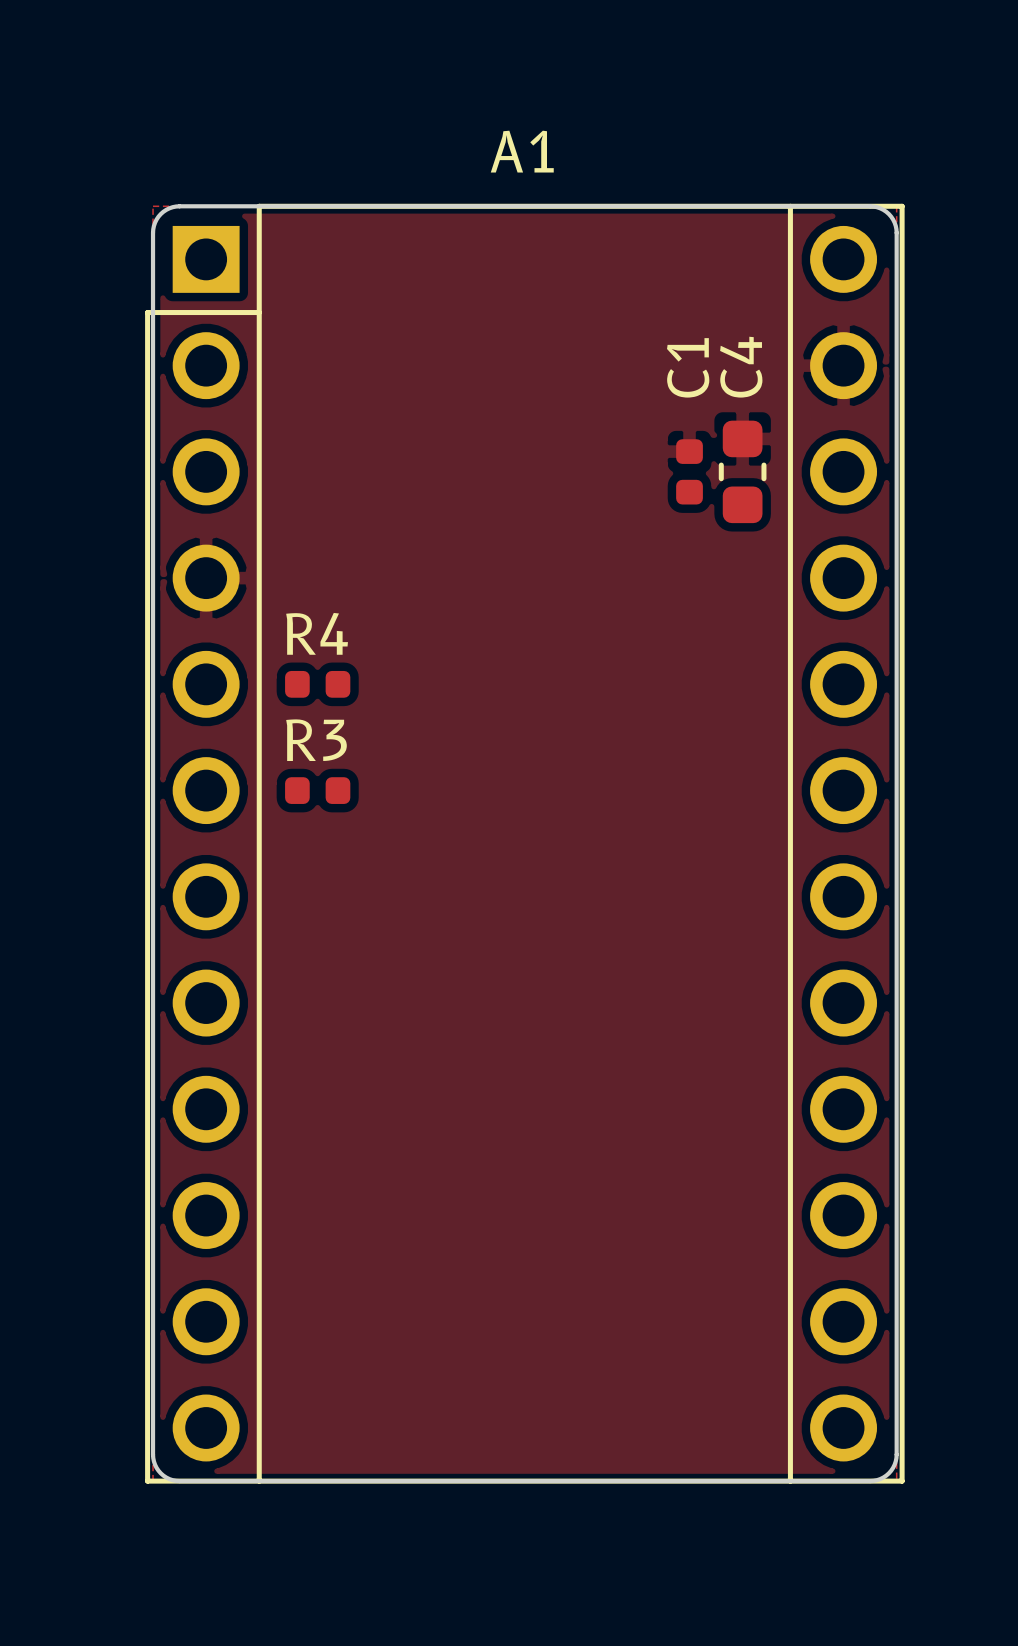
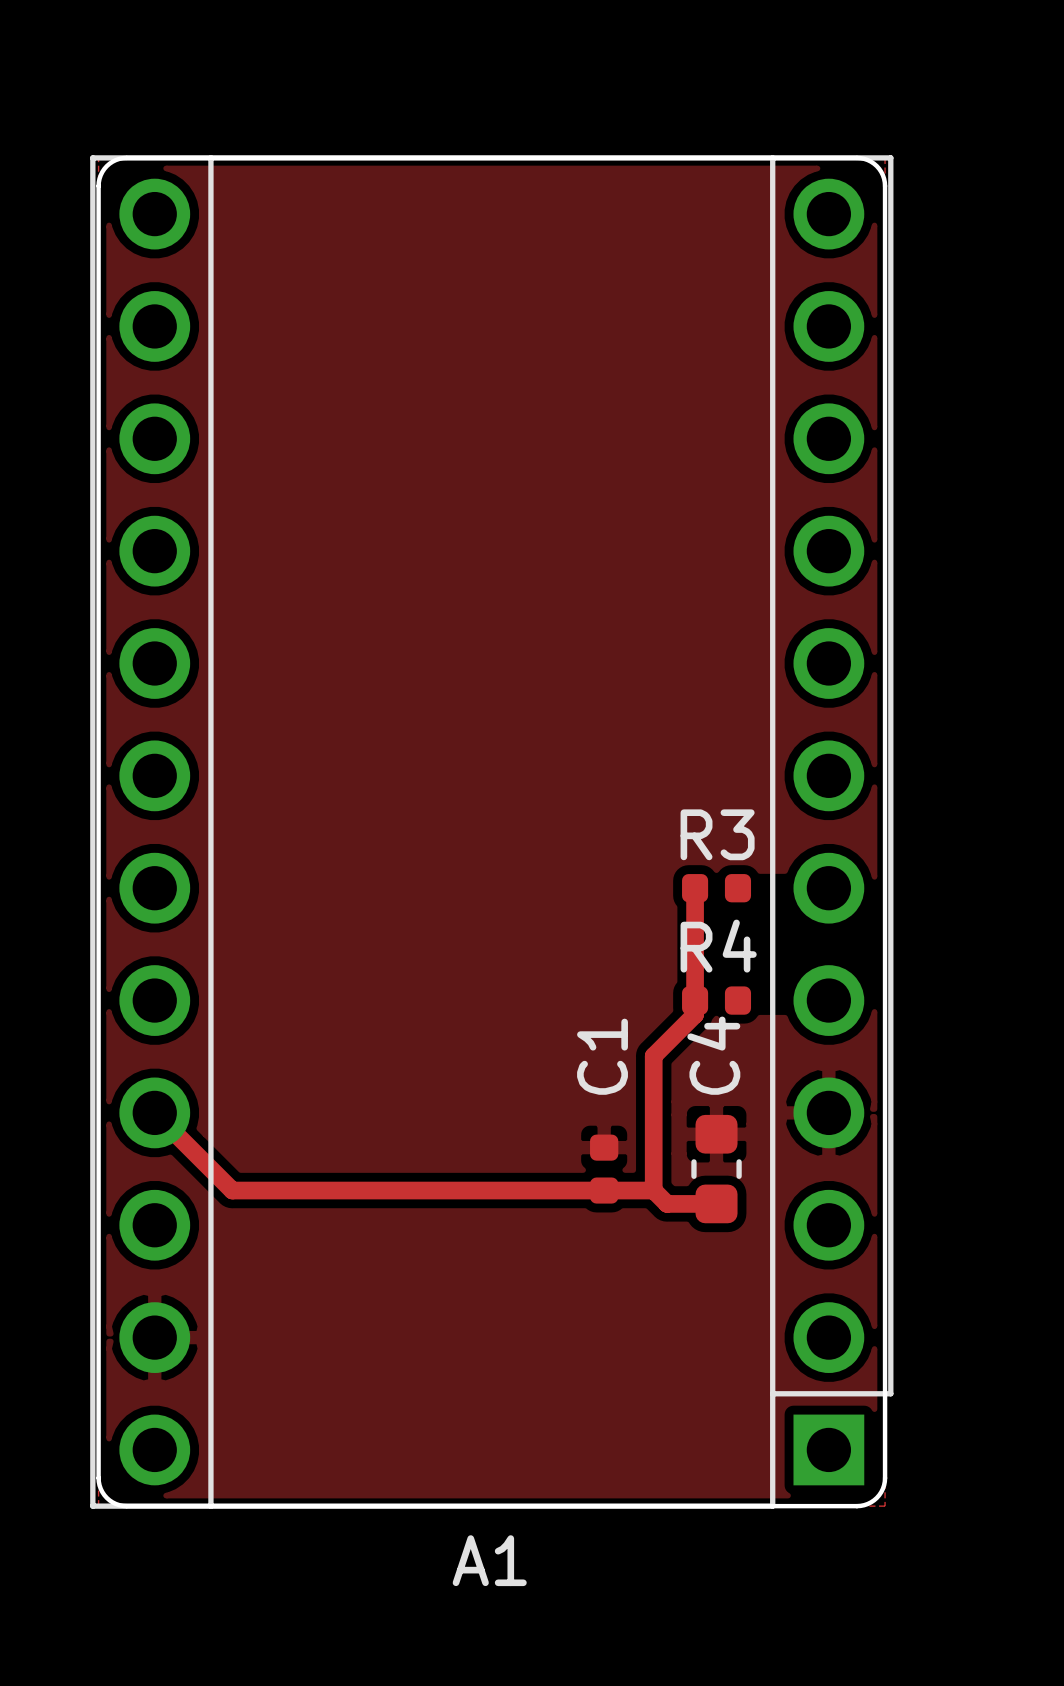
C1 position: (689, 471) -> (604, 1169)
C4 position: (742, 471) -> (716, 1169)
R4 position: (317, 684) -> (716, 1000)
R3 position: (317, 790) -> (716, 888)
A1 rotation: 0° (524, 843) -> 180° (491, 832)
track: none -> (695, 888) (695, 1014) (653, 1056) (653, 1190)
track: none -> (154, 1112) (232, 1190) (653, 1190)
track: none -> (653, 1190) (667, 1203) (716, 1203)

